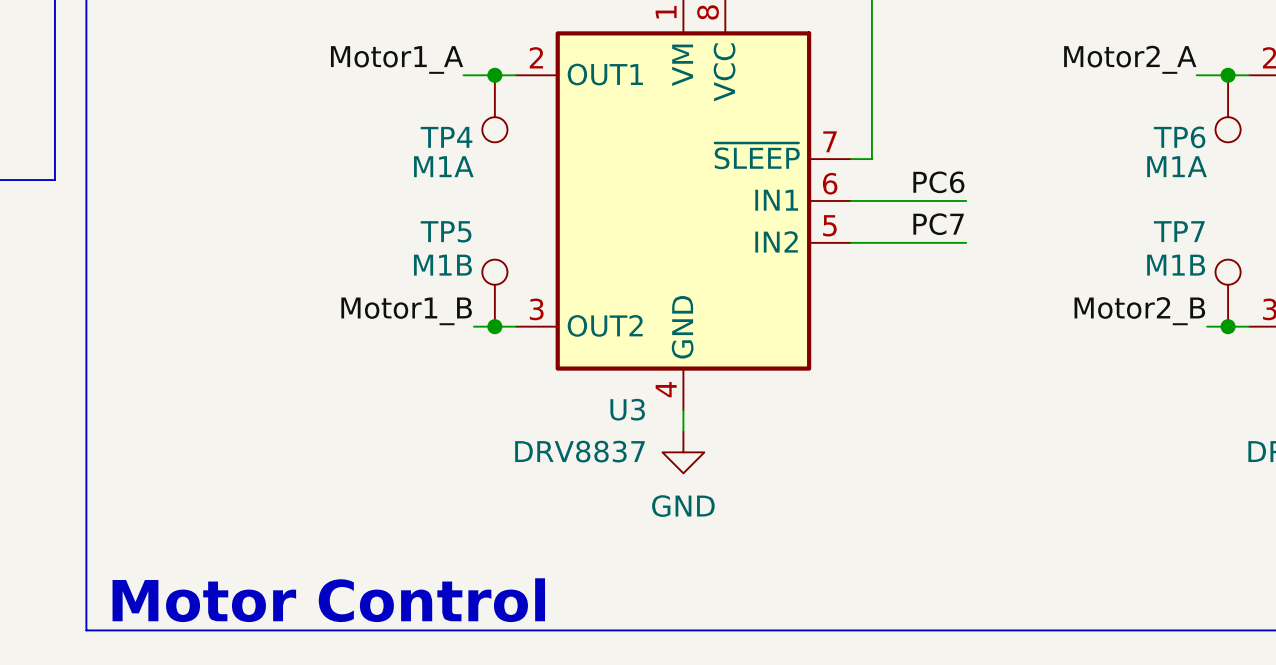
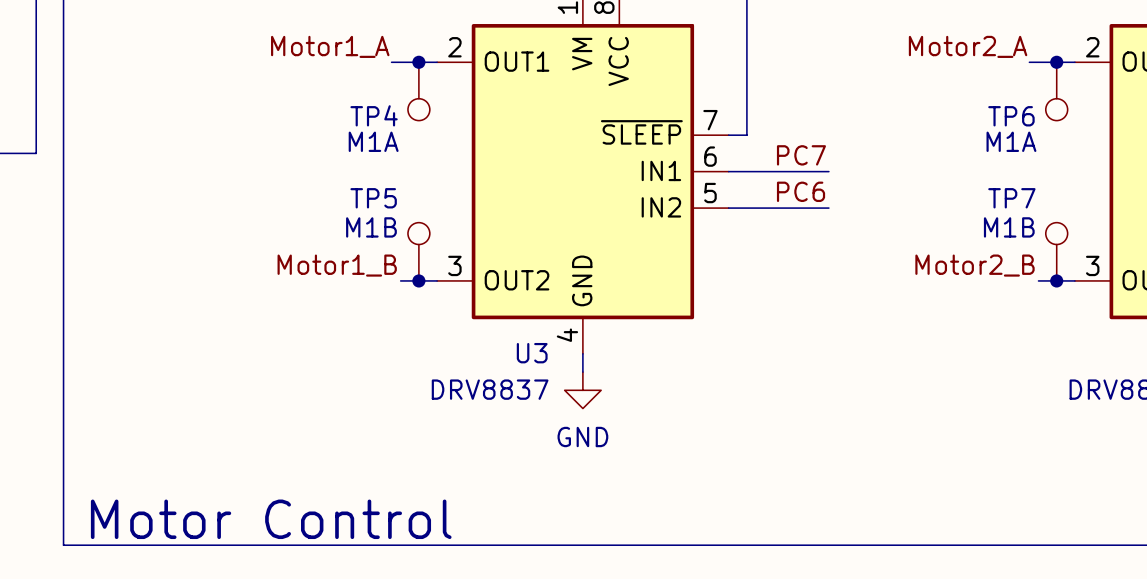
label: PC6 (938, 182) -> PC7 (801, 155)
label: PC7 (938, 224) -> PC6 (801, 191)

